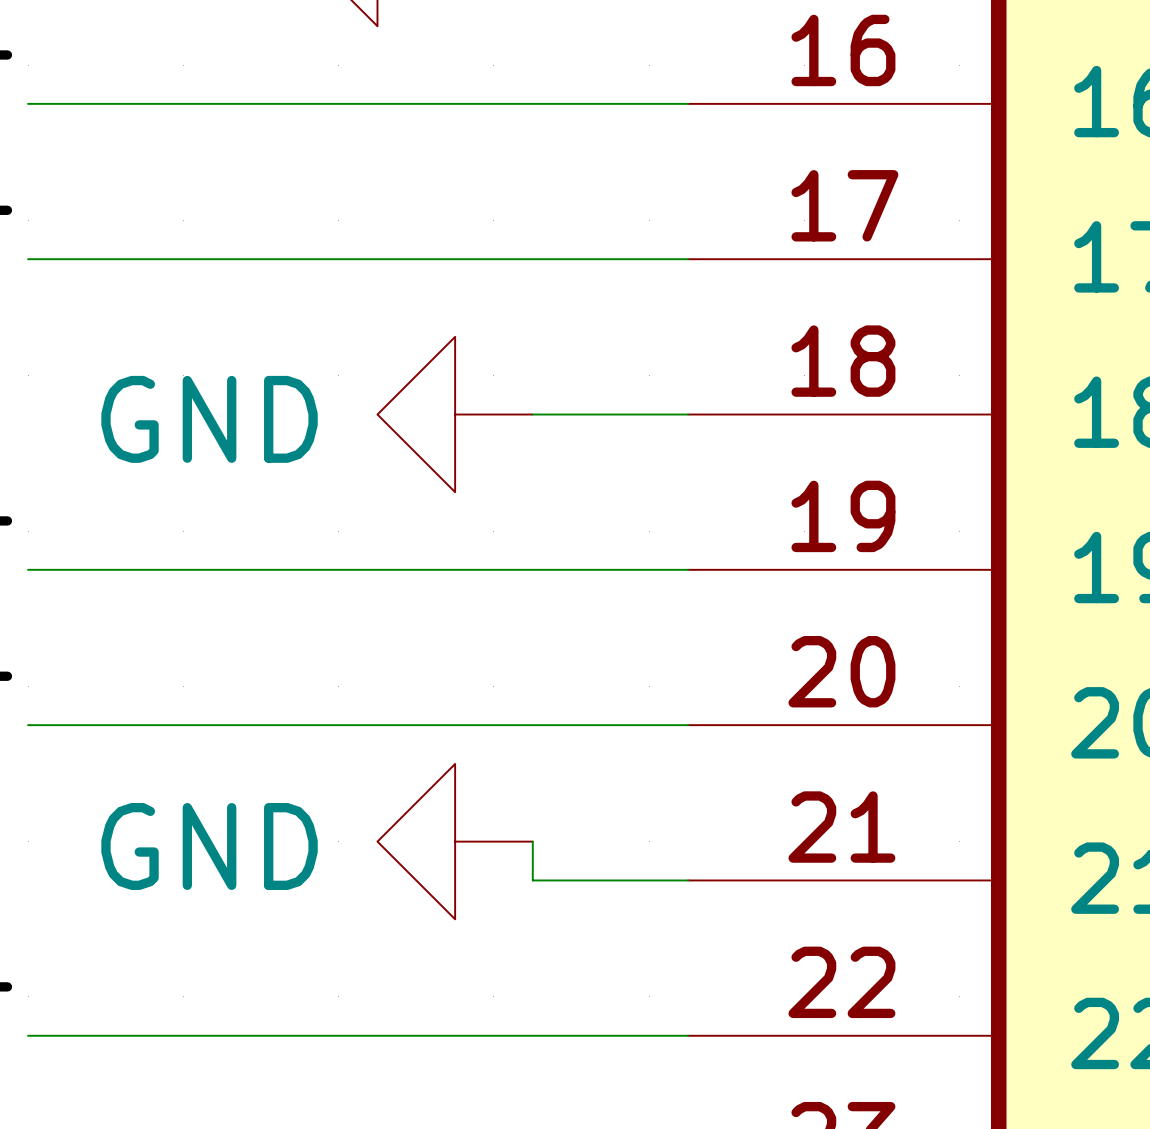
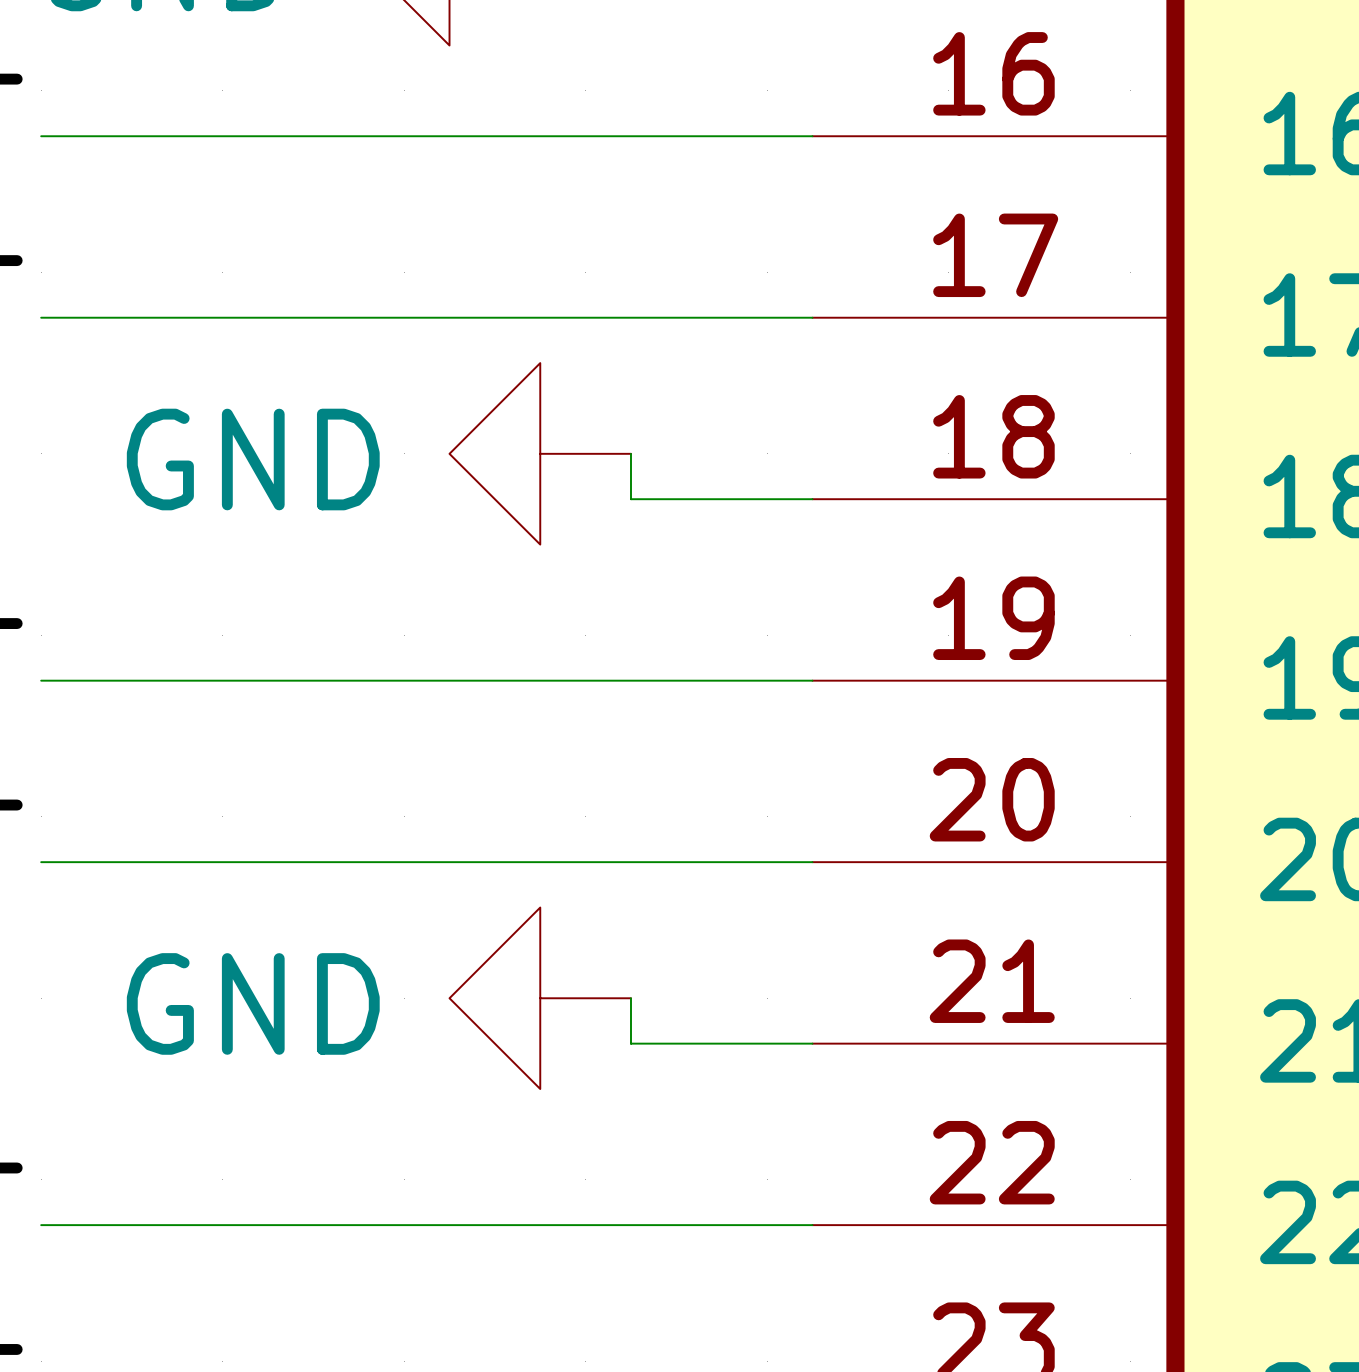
wire: none -> (630, 453) (630, 499)
power symbol position: GND (455, 414) -> GND (540, 453)

